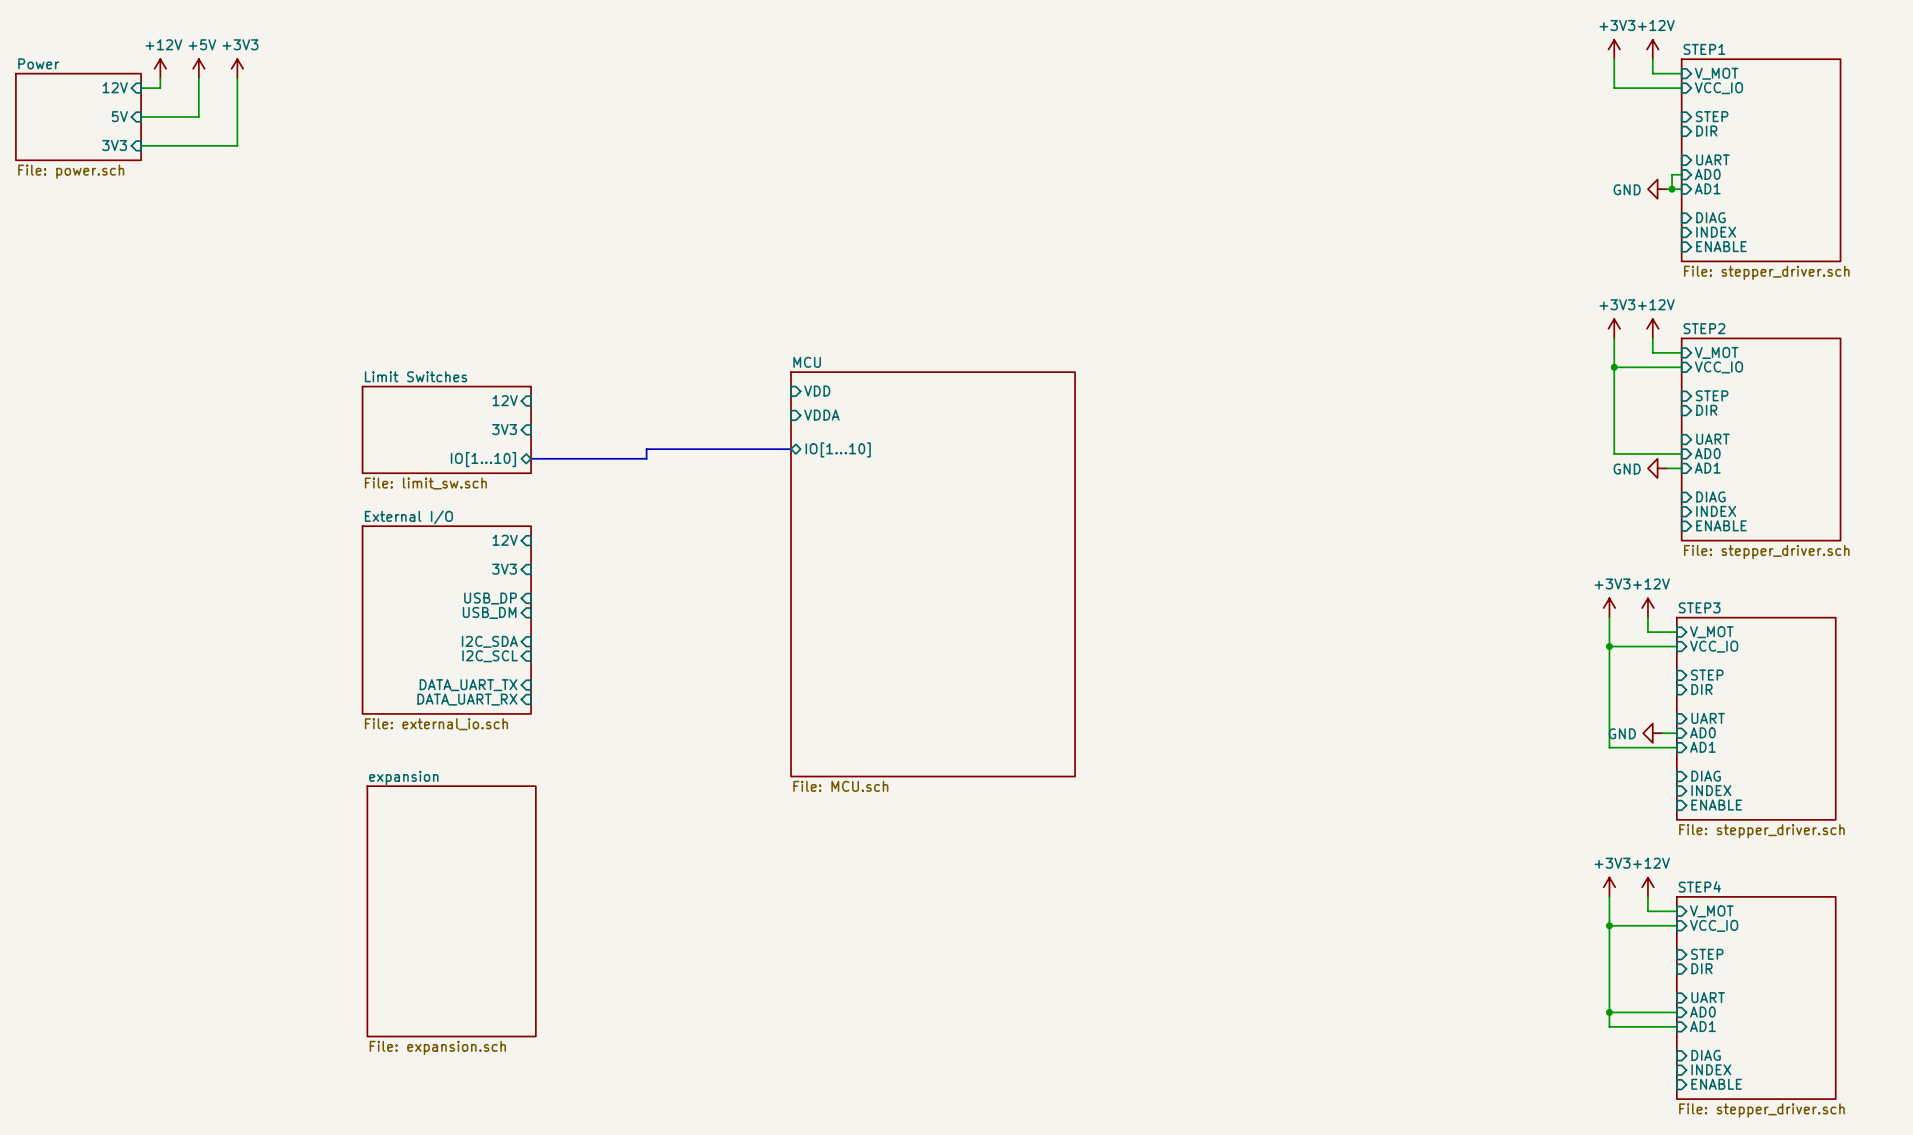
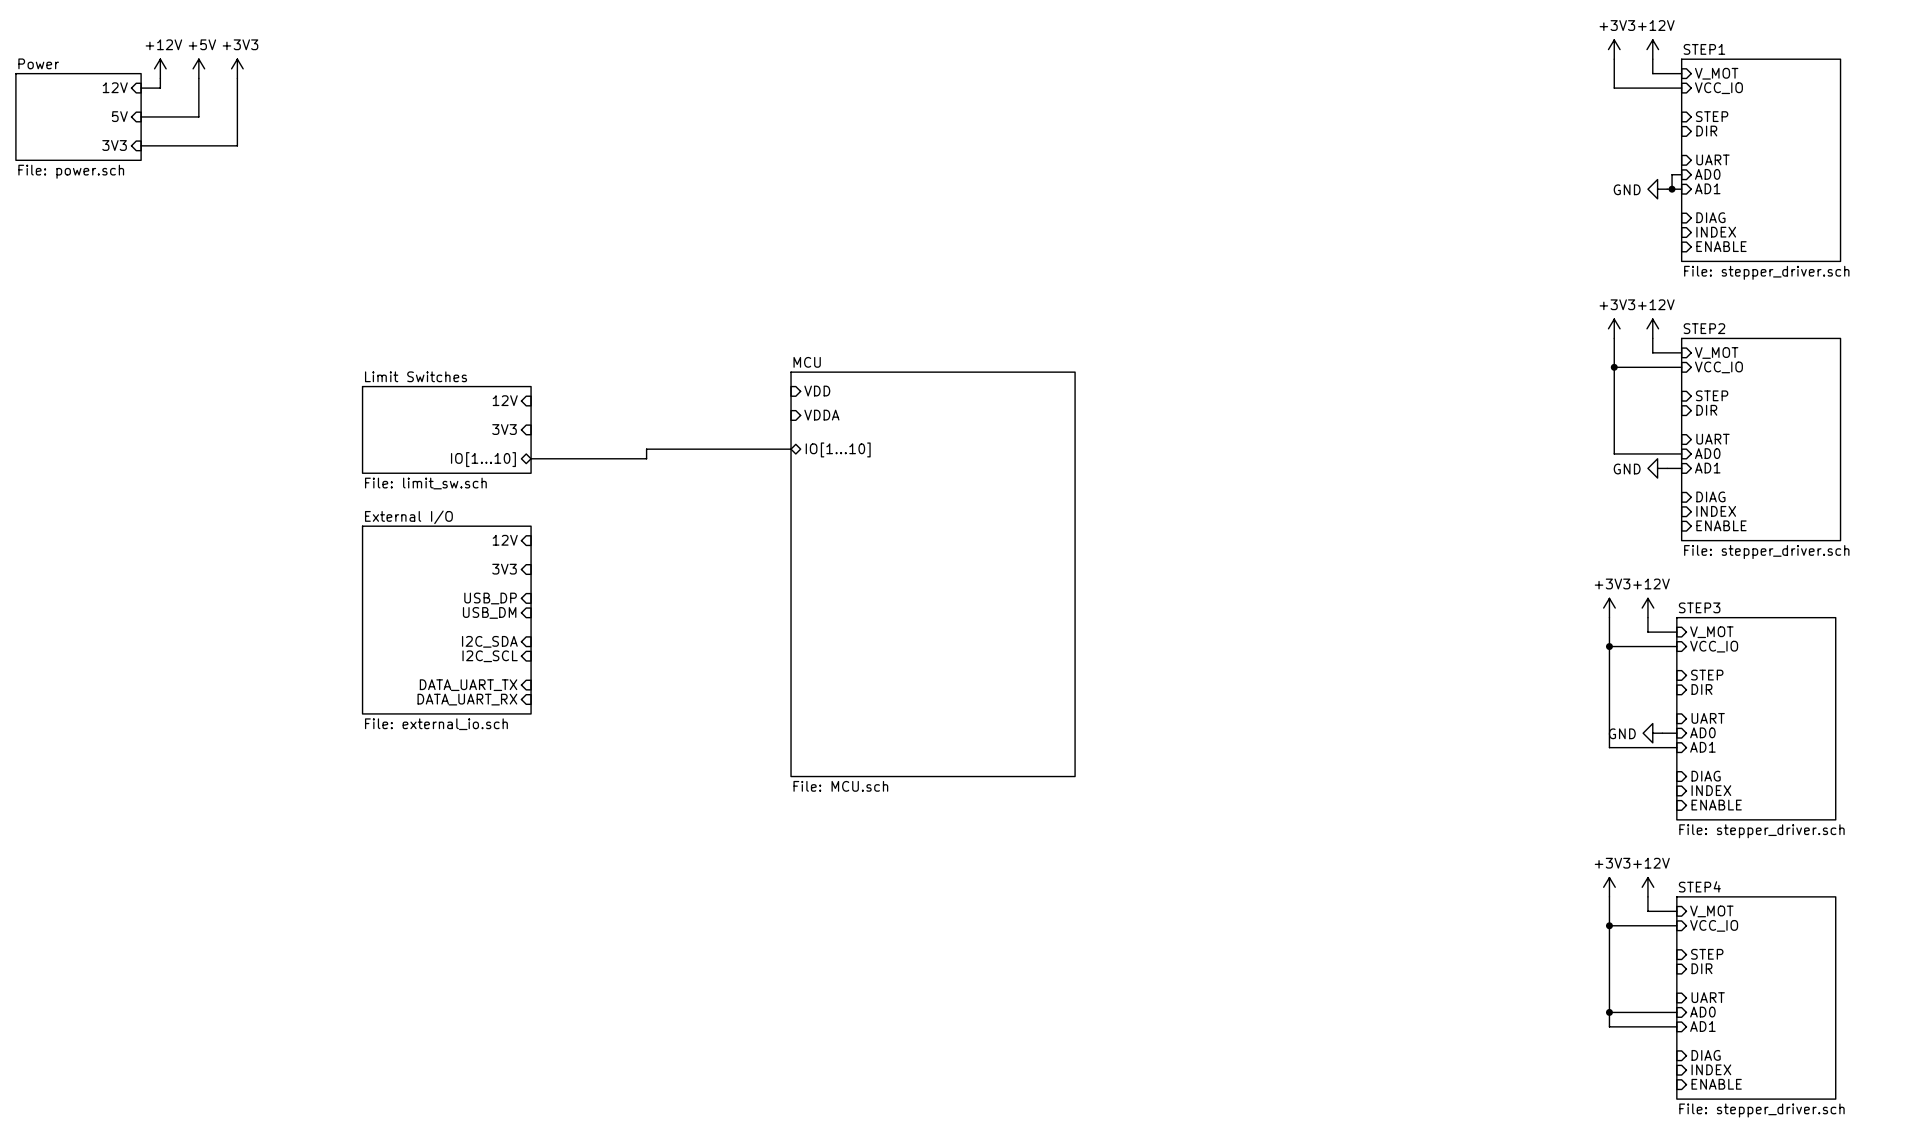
sheet expansion: File: expansion.sch (451, 911) -> none

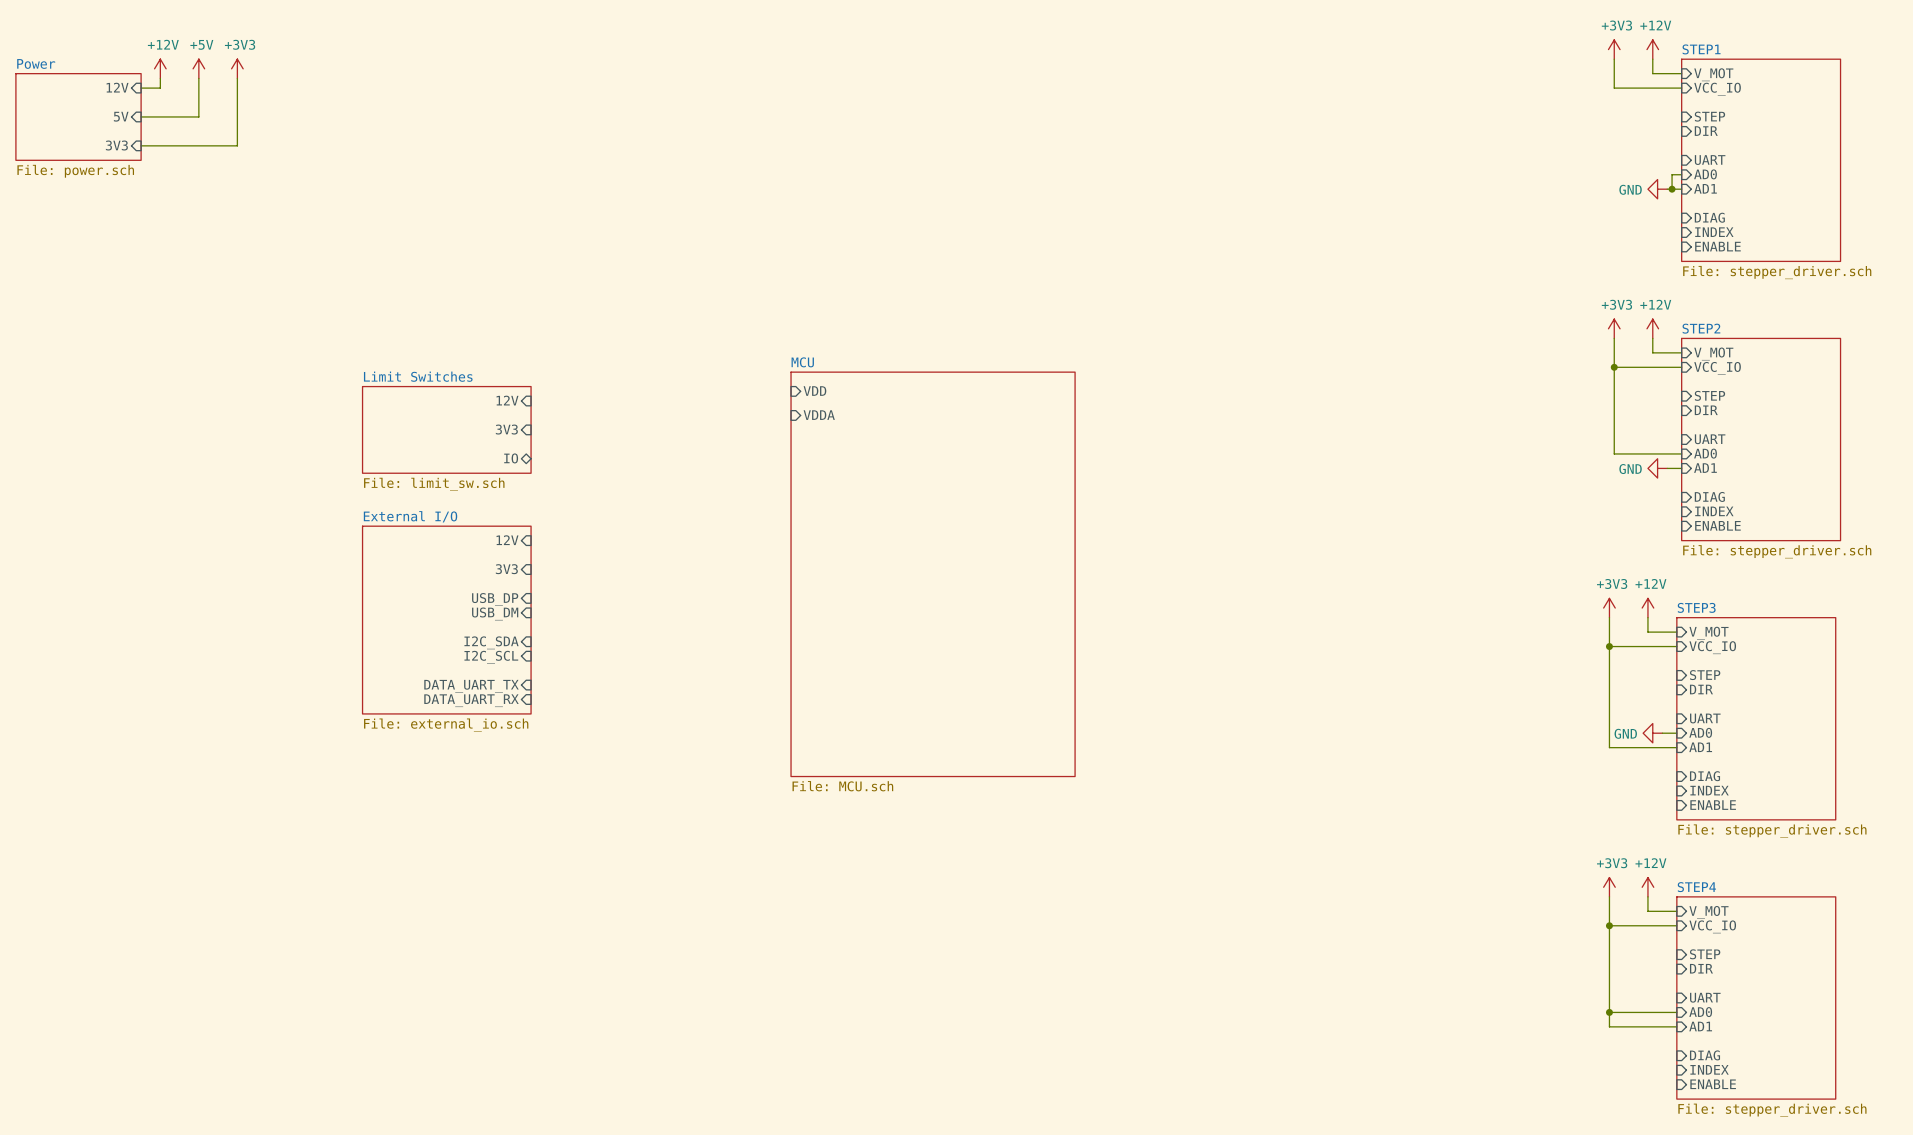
bus: (791, 449) (646, 449) (646, 458) (531, 458) -> none
sheet pin: IO[1...10] (838, 449) -> none
sheet pin: IO[1...10] (483, 459) -> IO (511, 458)

